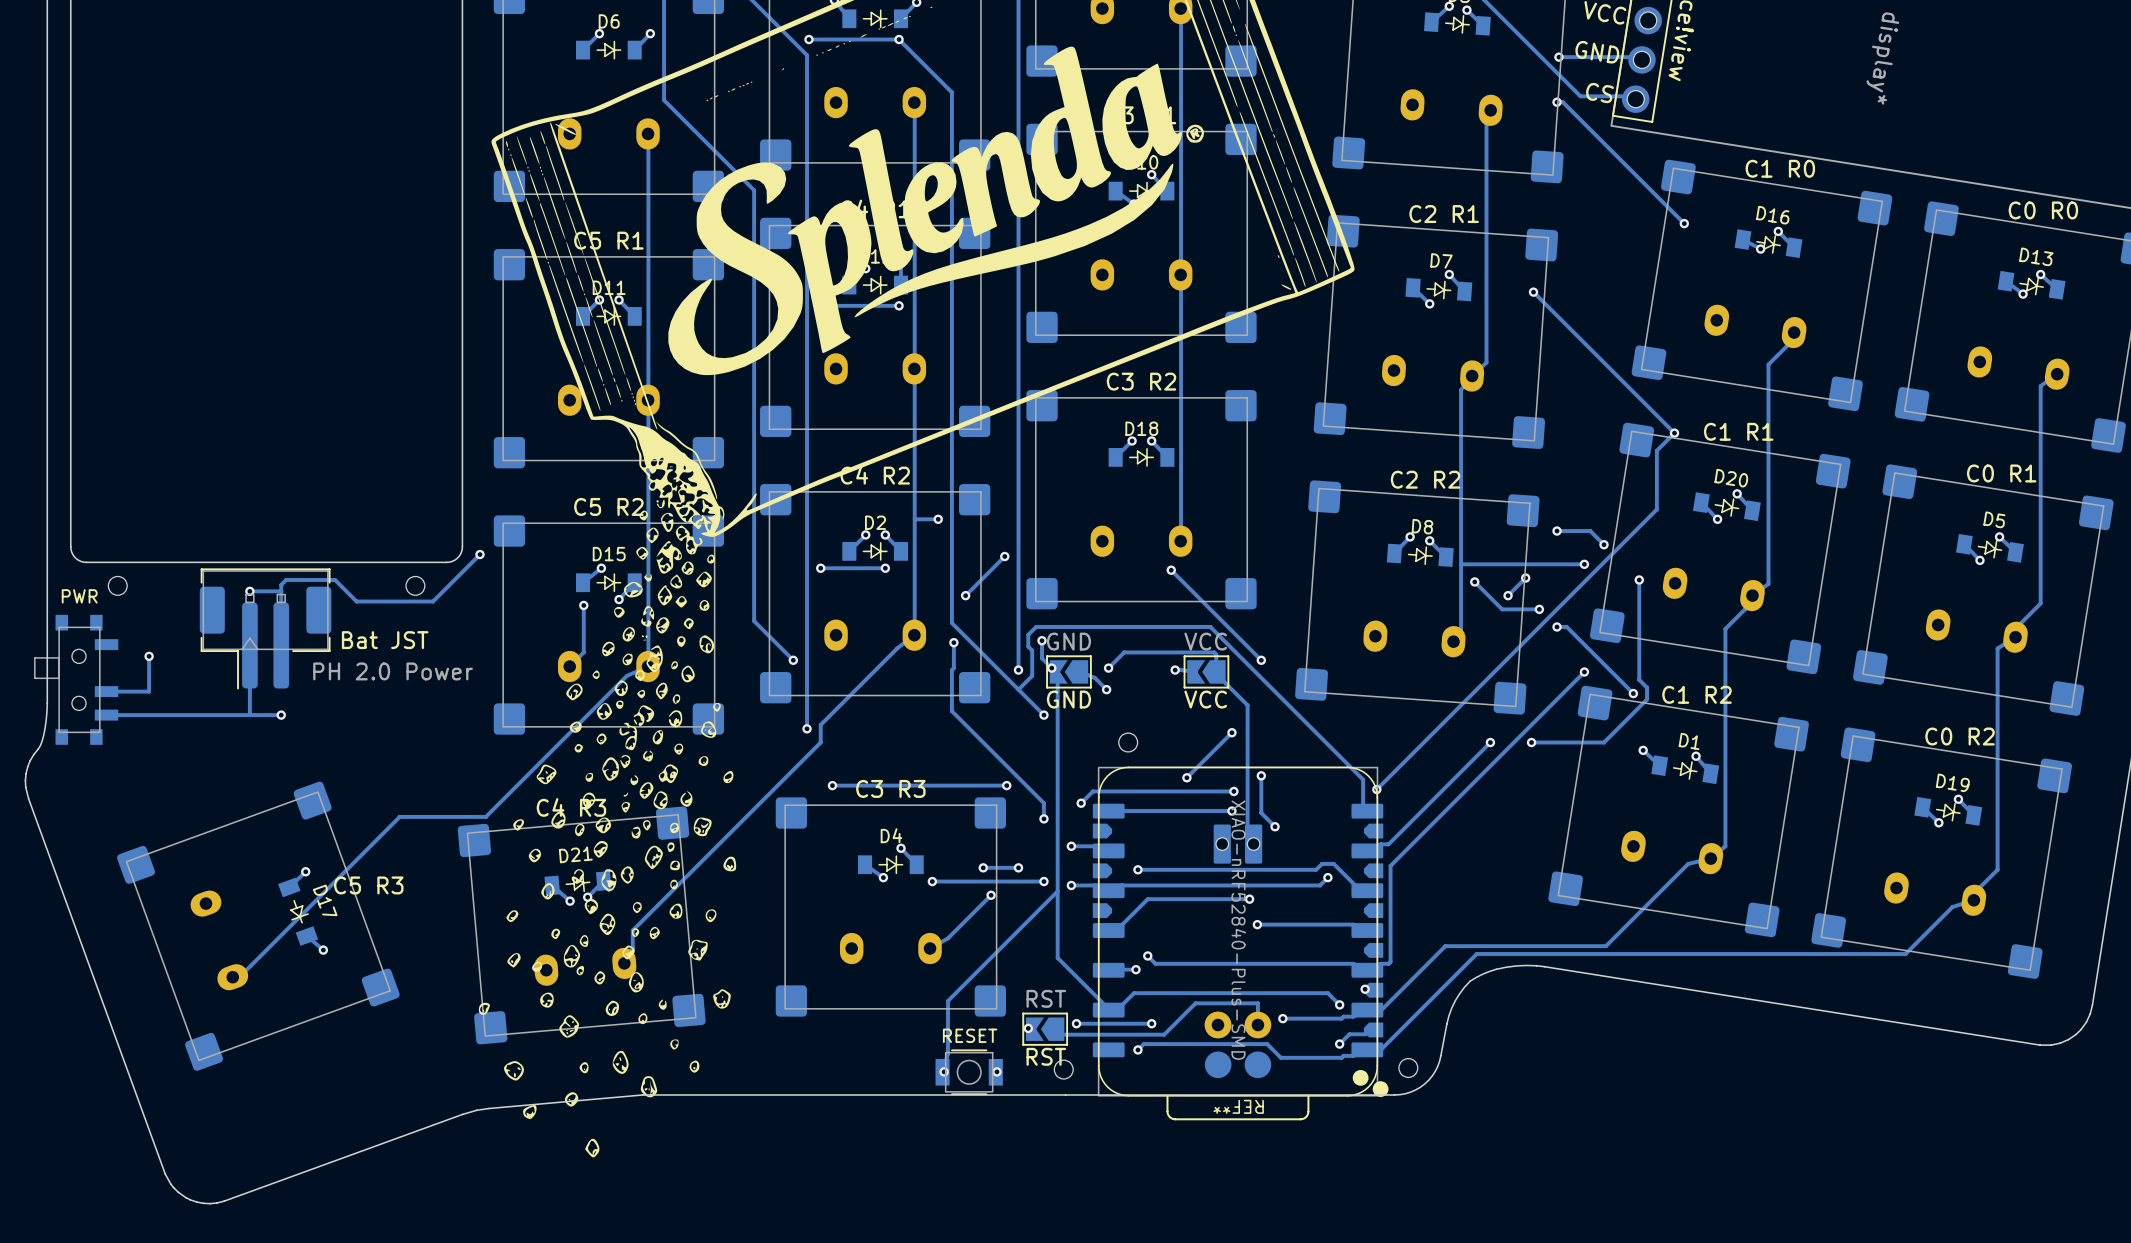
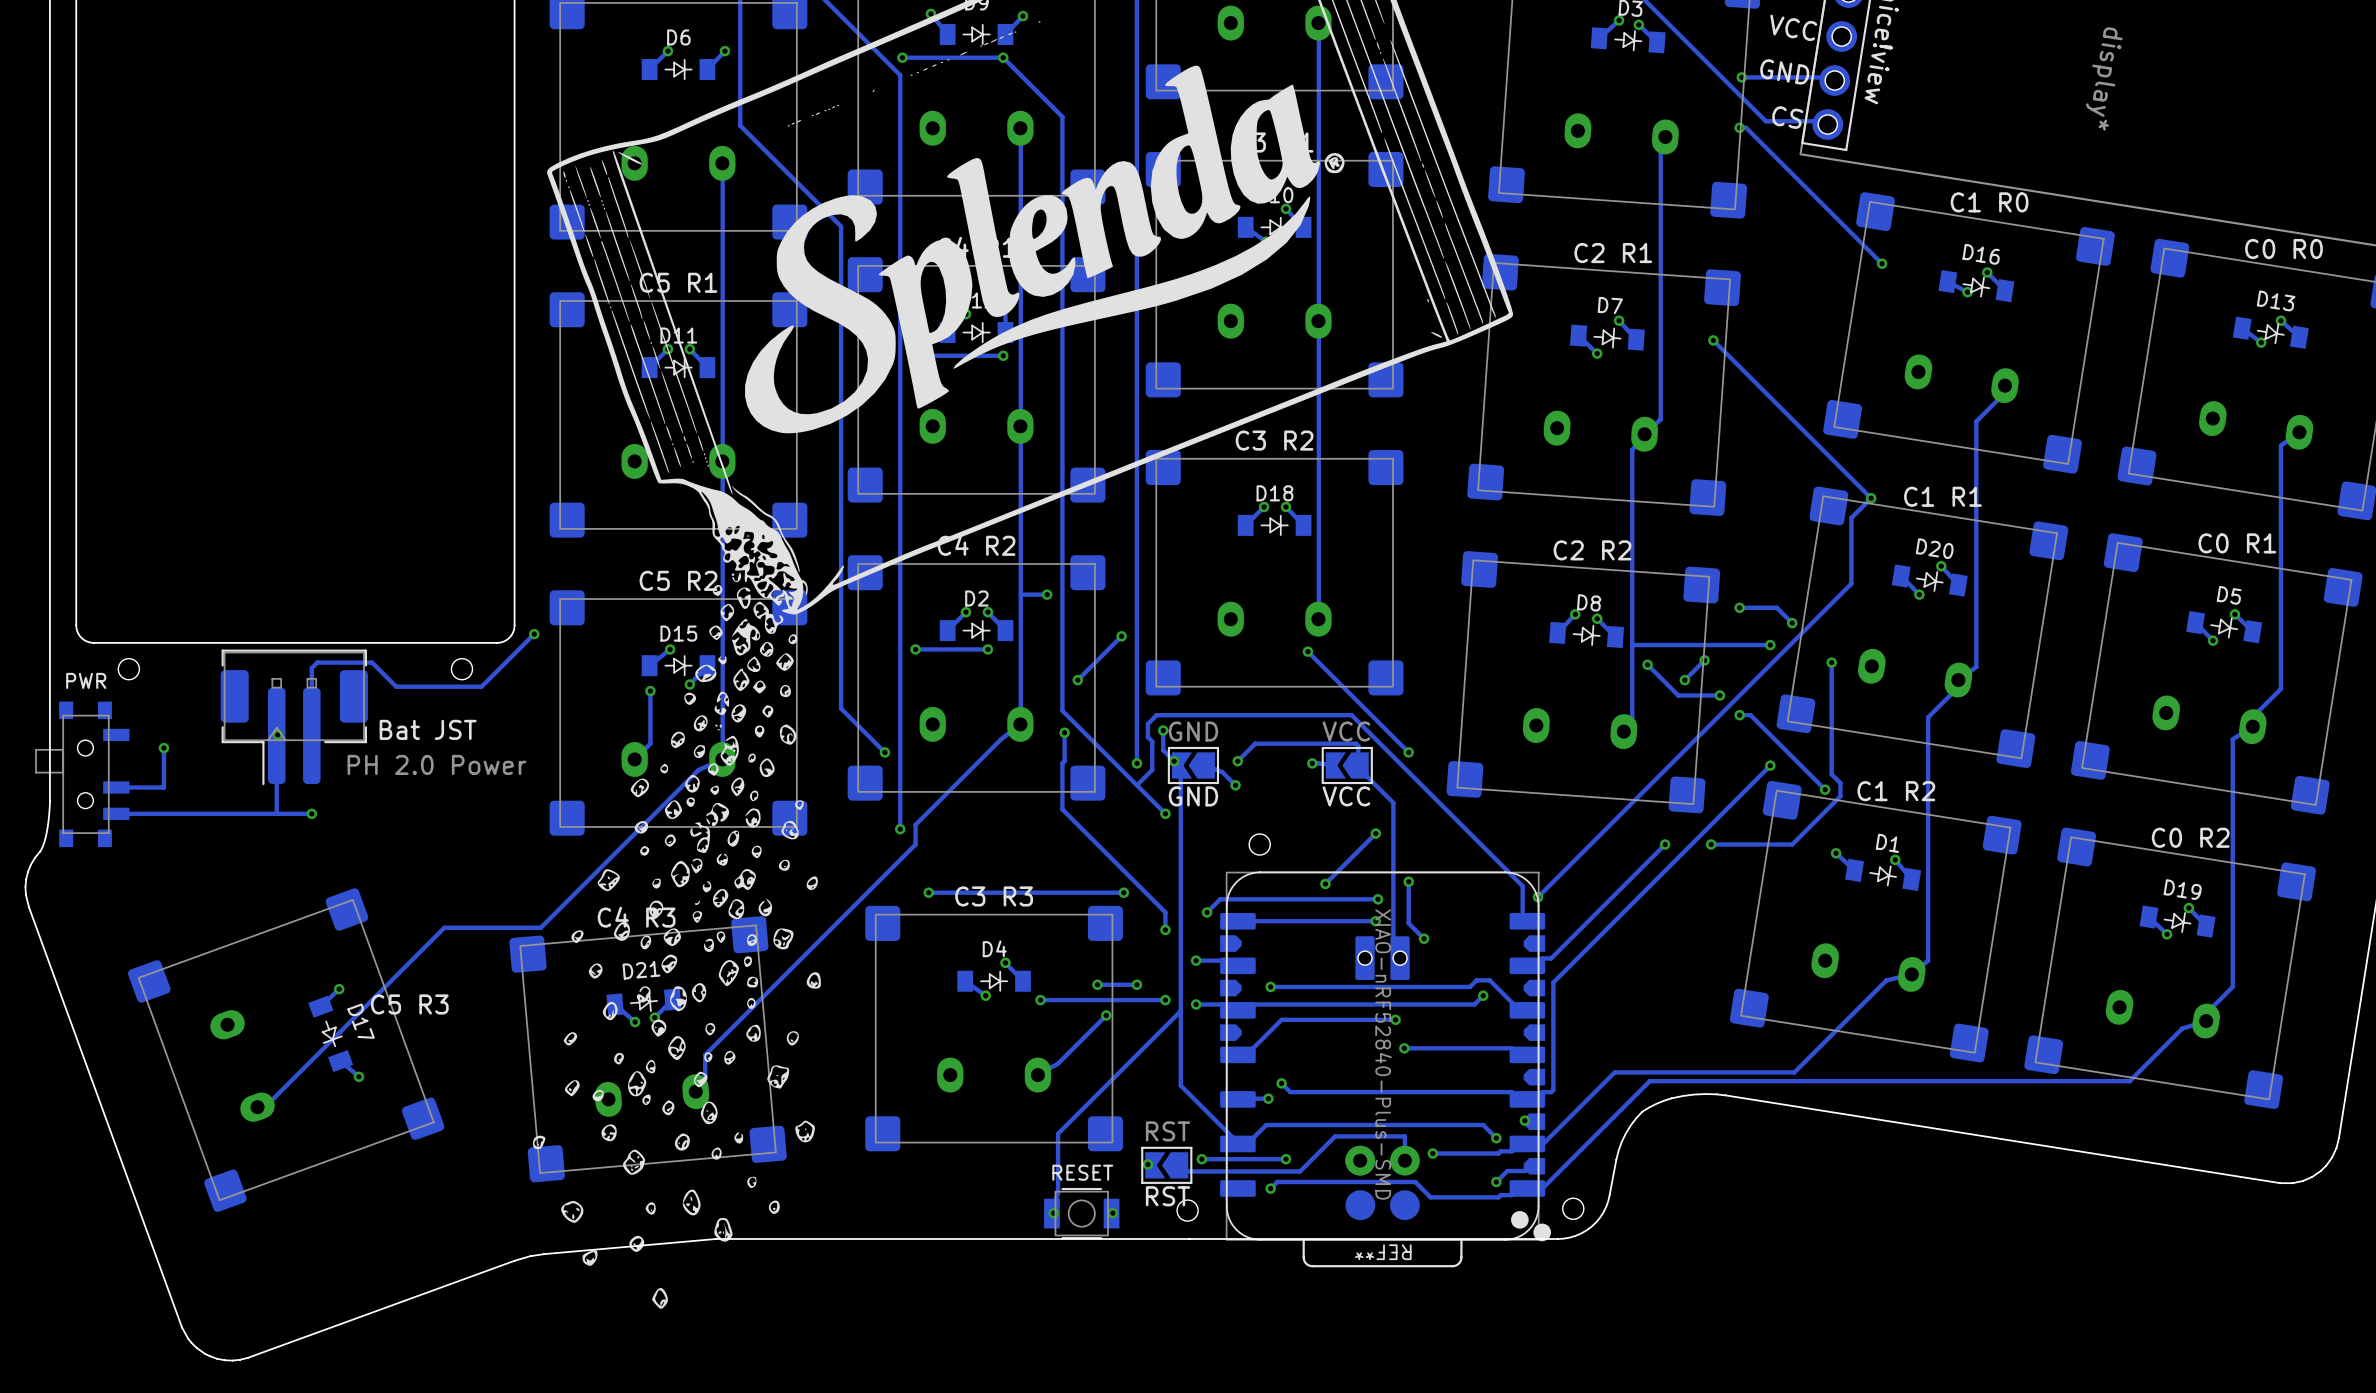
via position: (249, 591) -> (277, 734)
track: (281, 591) (249, 591) -> none

